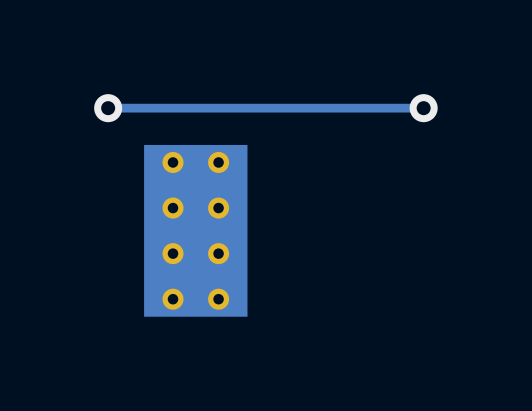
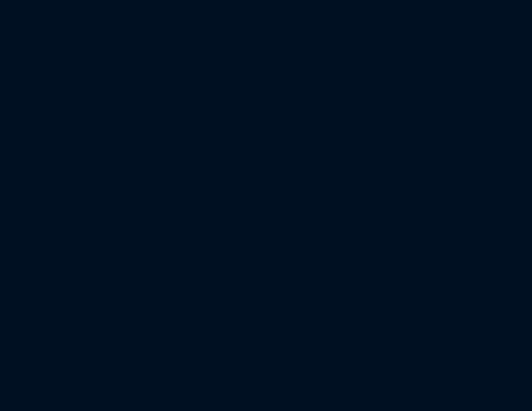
via: (108, 108) -> none
track: (423, 108) (108, 108) -> none
via: (423, 108) -> none
part: (195, 230) -> none

